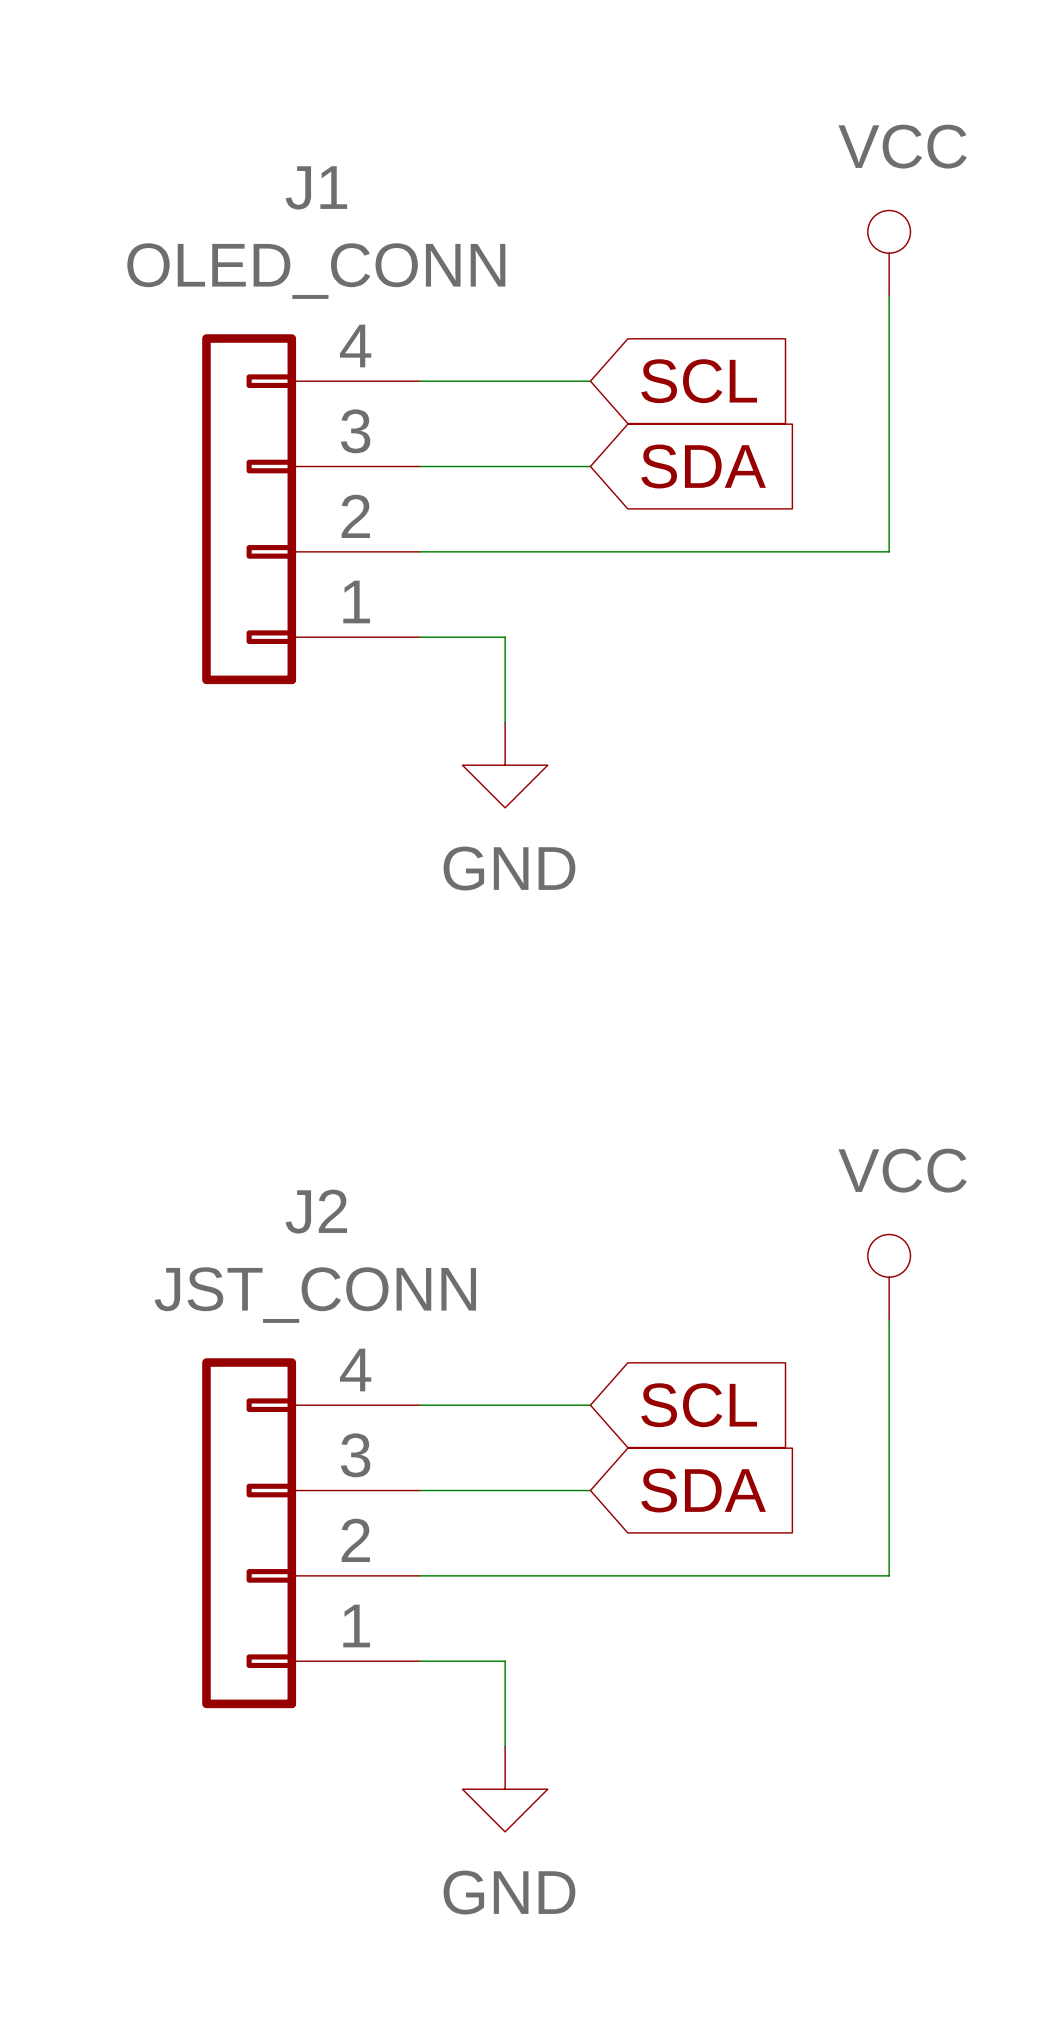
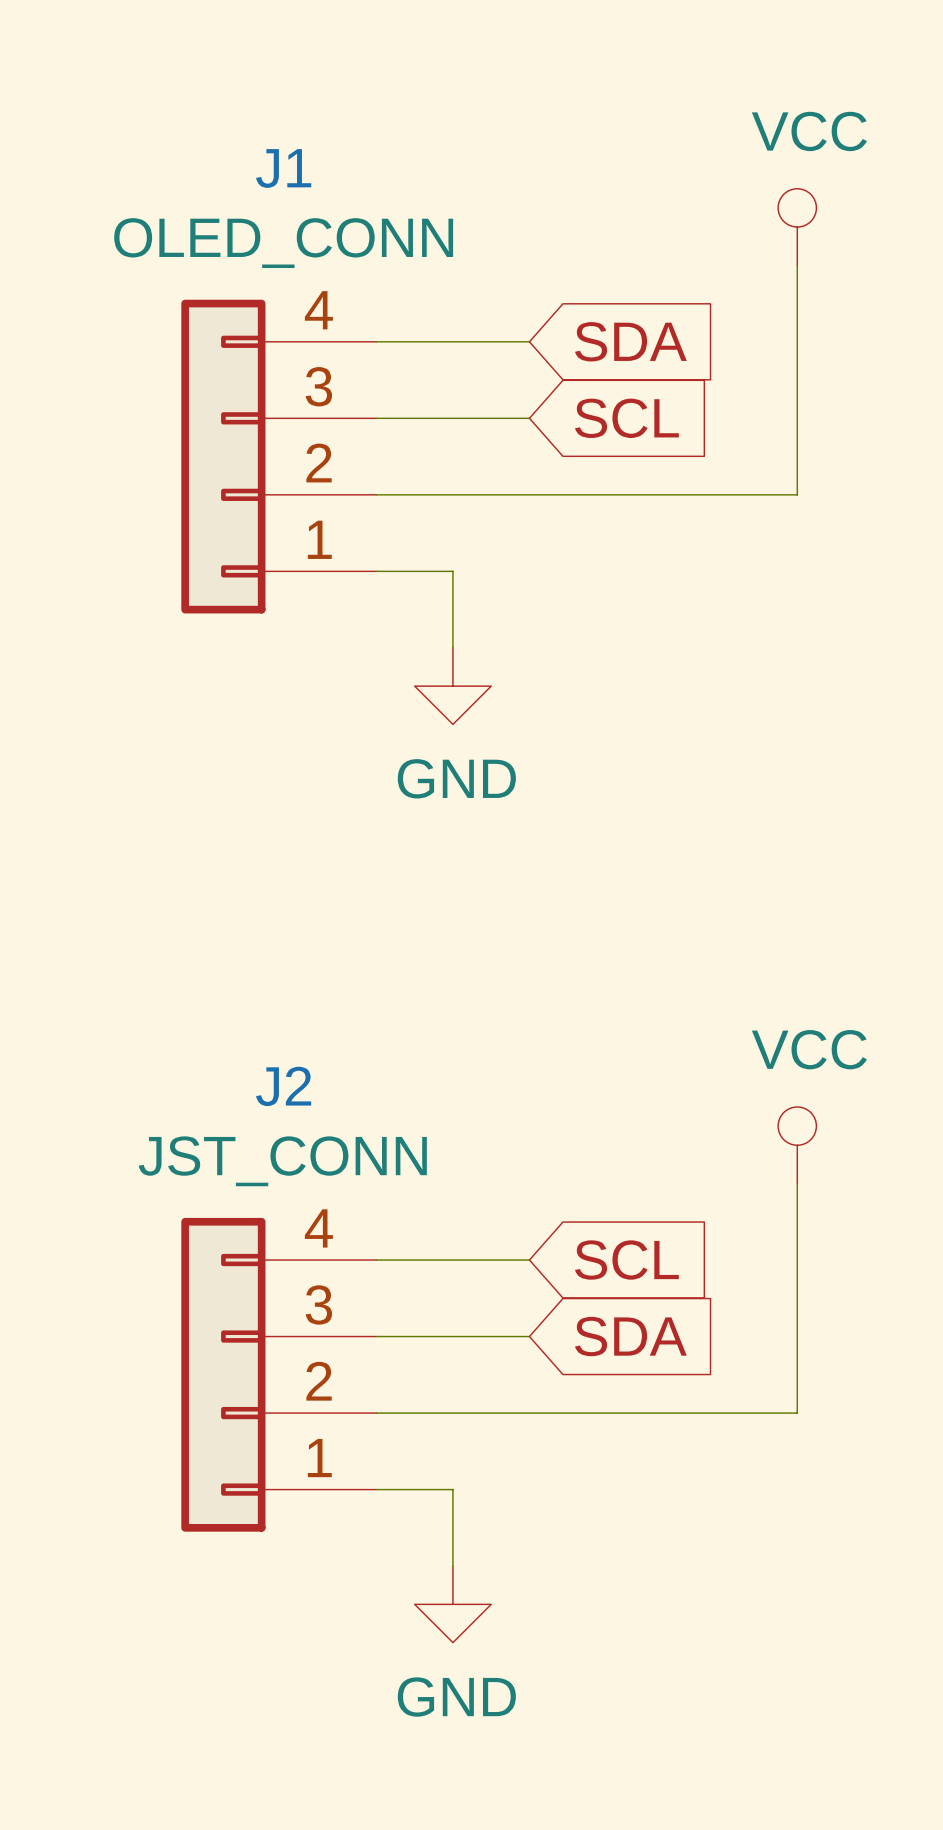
global label: SCL (699, 381) -> SDA (630, 341)
global label: SDA (703, 466) -> SCL (626, 418)

